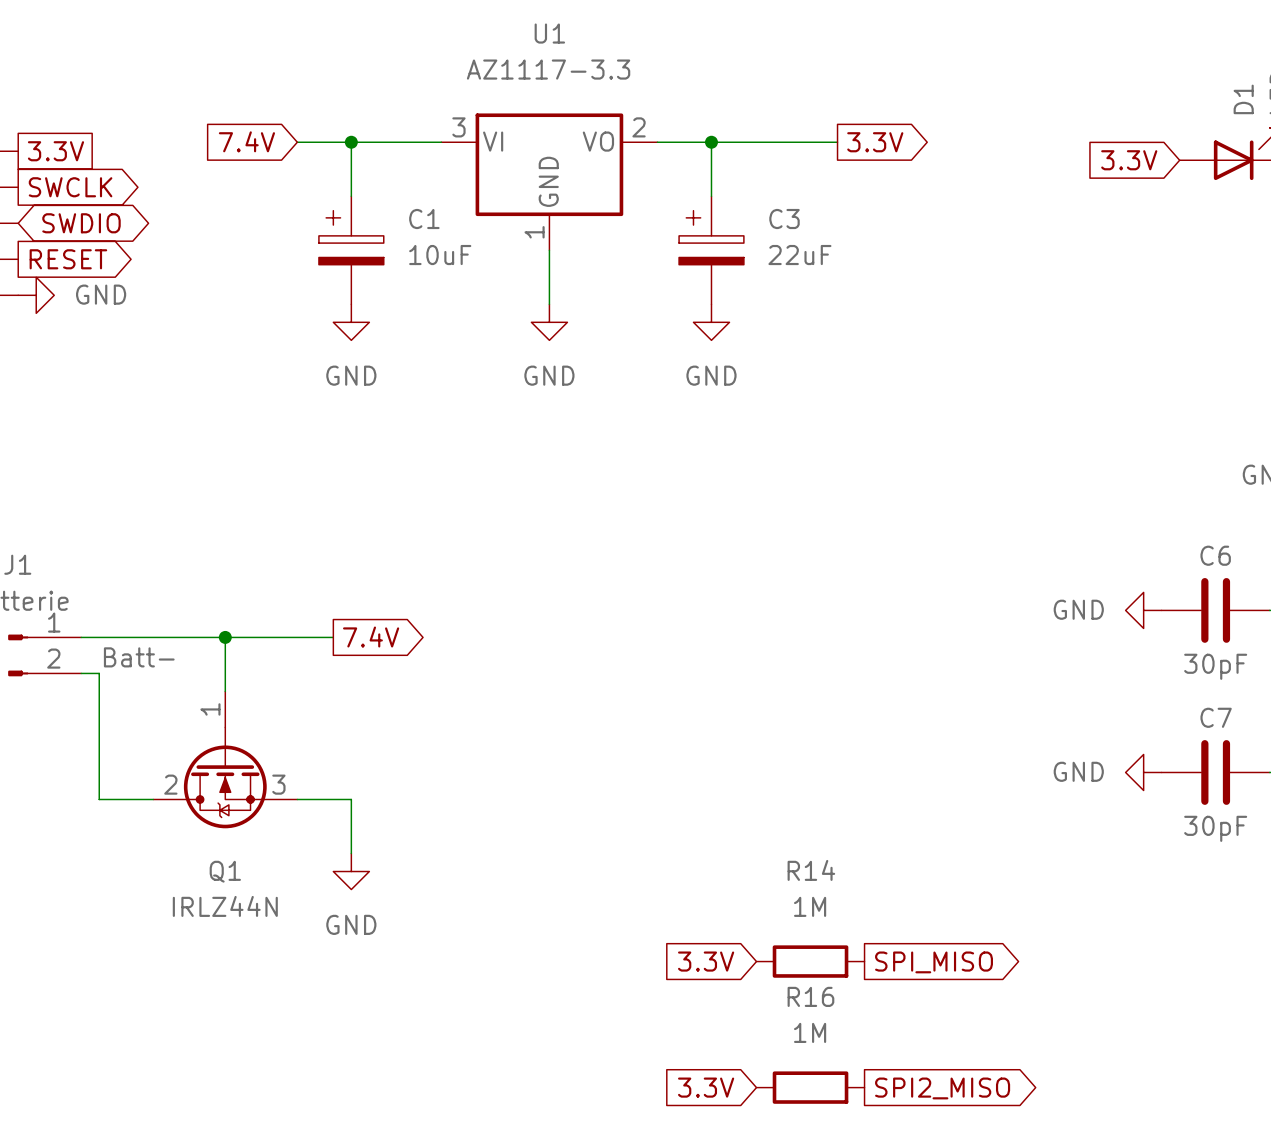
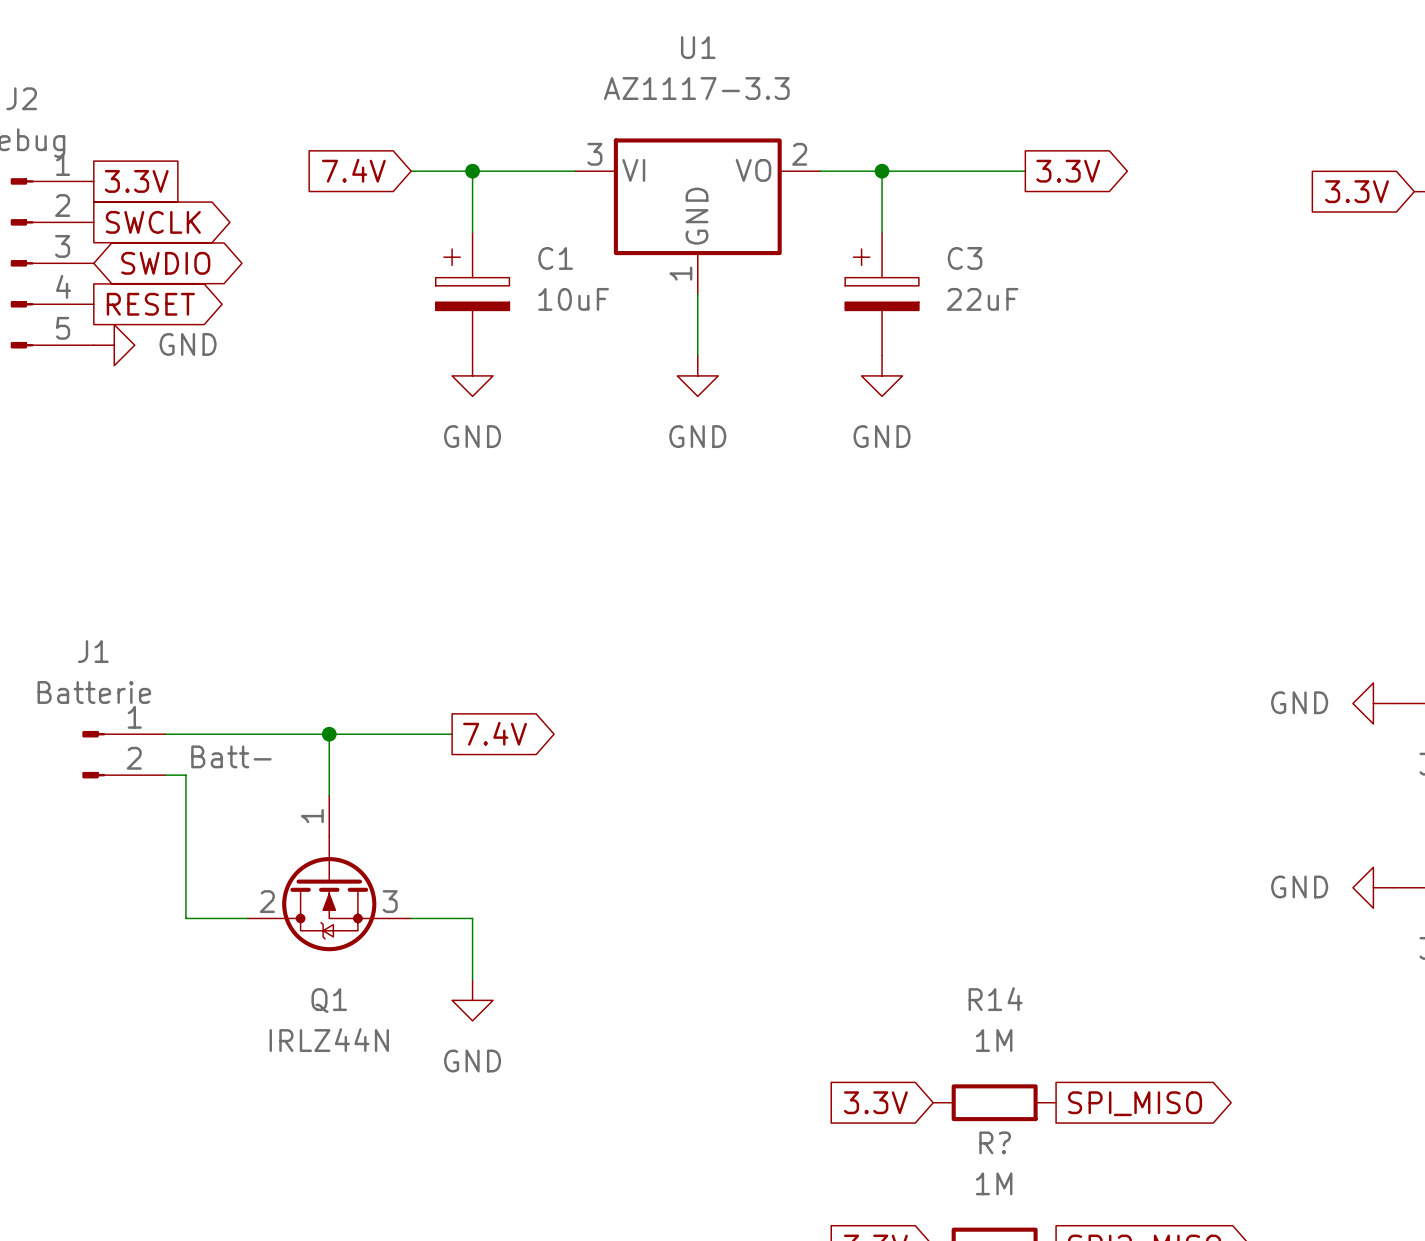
R16 name: R16 (810, 996) -> R? (995, 1142)

